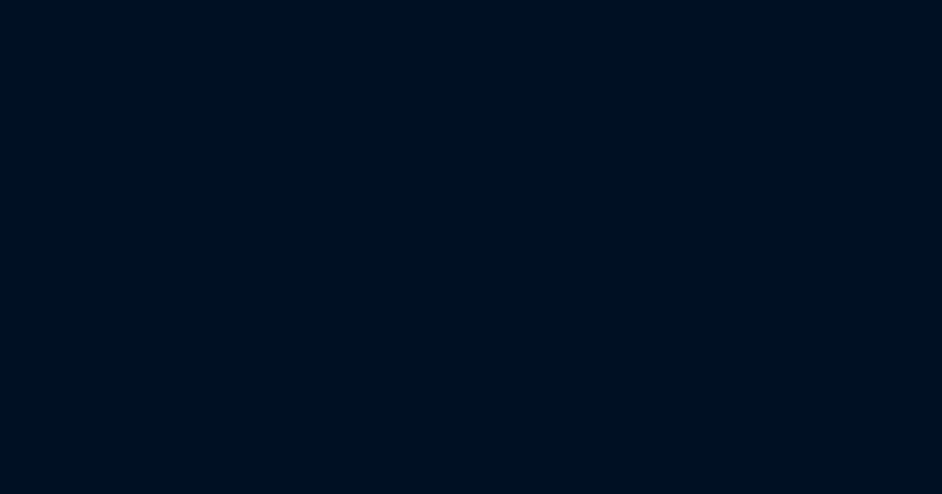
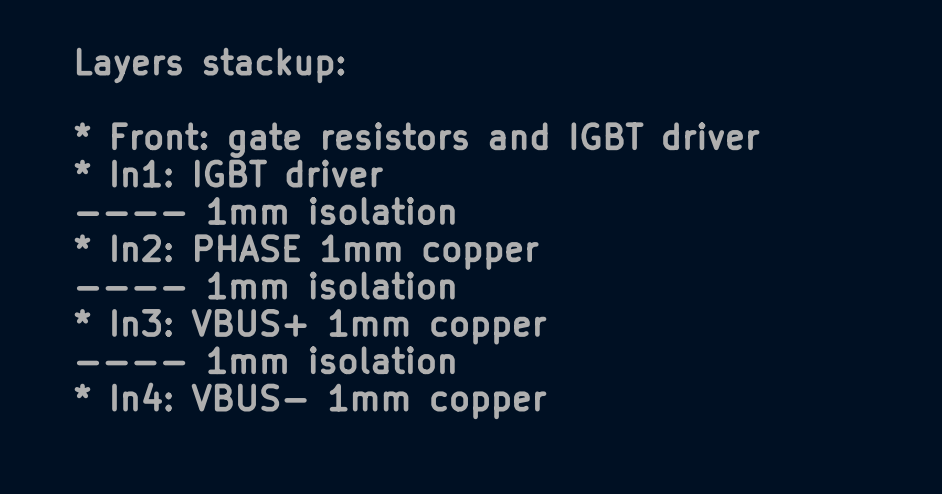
text: none -> Layers stackup: (210, 65)
text: none -> * Front: gate resistors and IGBT driver (417, 140)
text: none -> * In1: IGBT driver (228, 173)
text: none -> ---- 1mm isolation (265, 210)
text: none -> * In2: PHASE 1mm copper (306, 252)
text: none -> ---- 1mm isolation (265, 285)
text: none -> * In3: VBUS+ 1mm copper (310, 326)
text: none -> ---- 1mm isolation (265, 360)
text: none -> * In4: VBUS- 1mm copper (310, 400)

